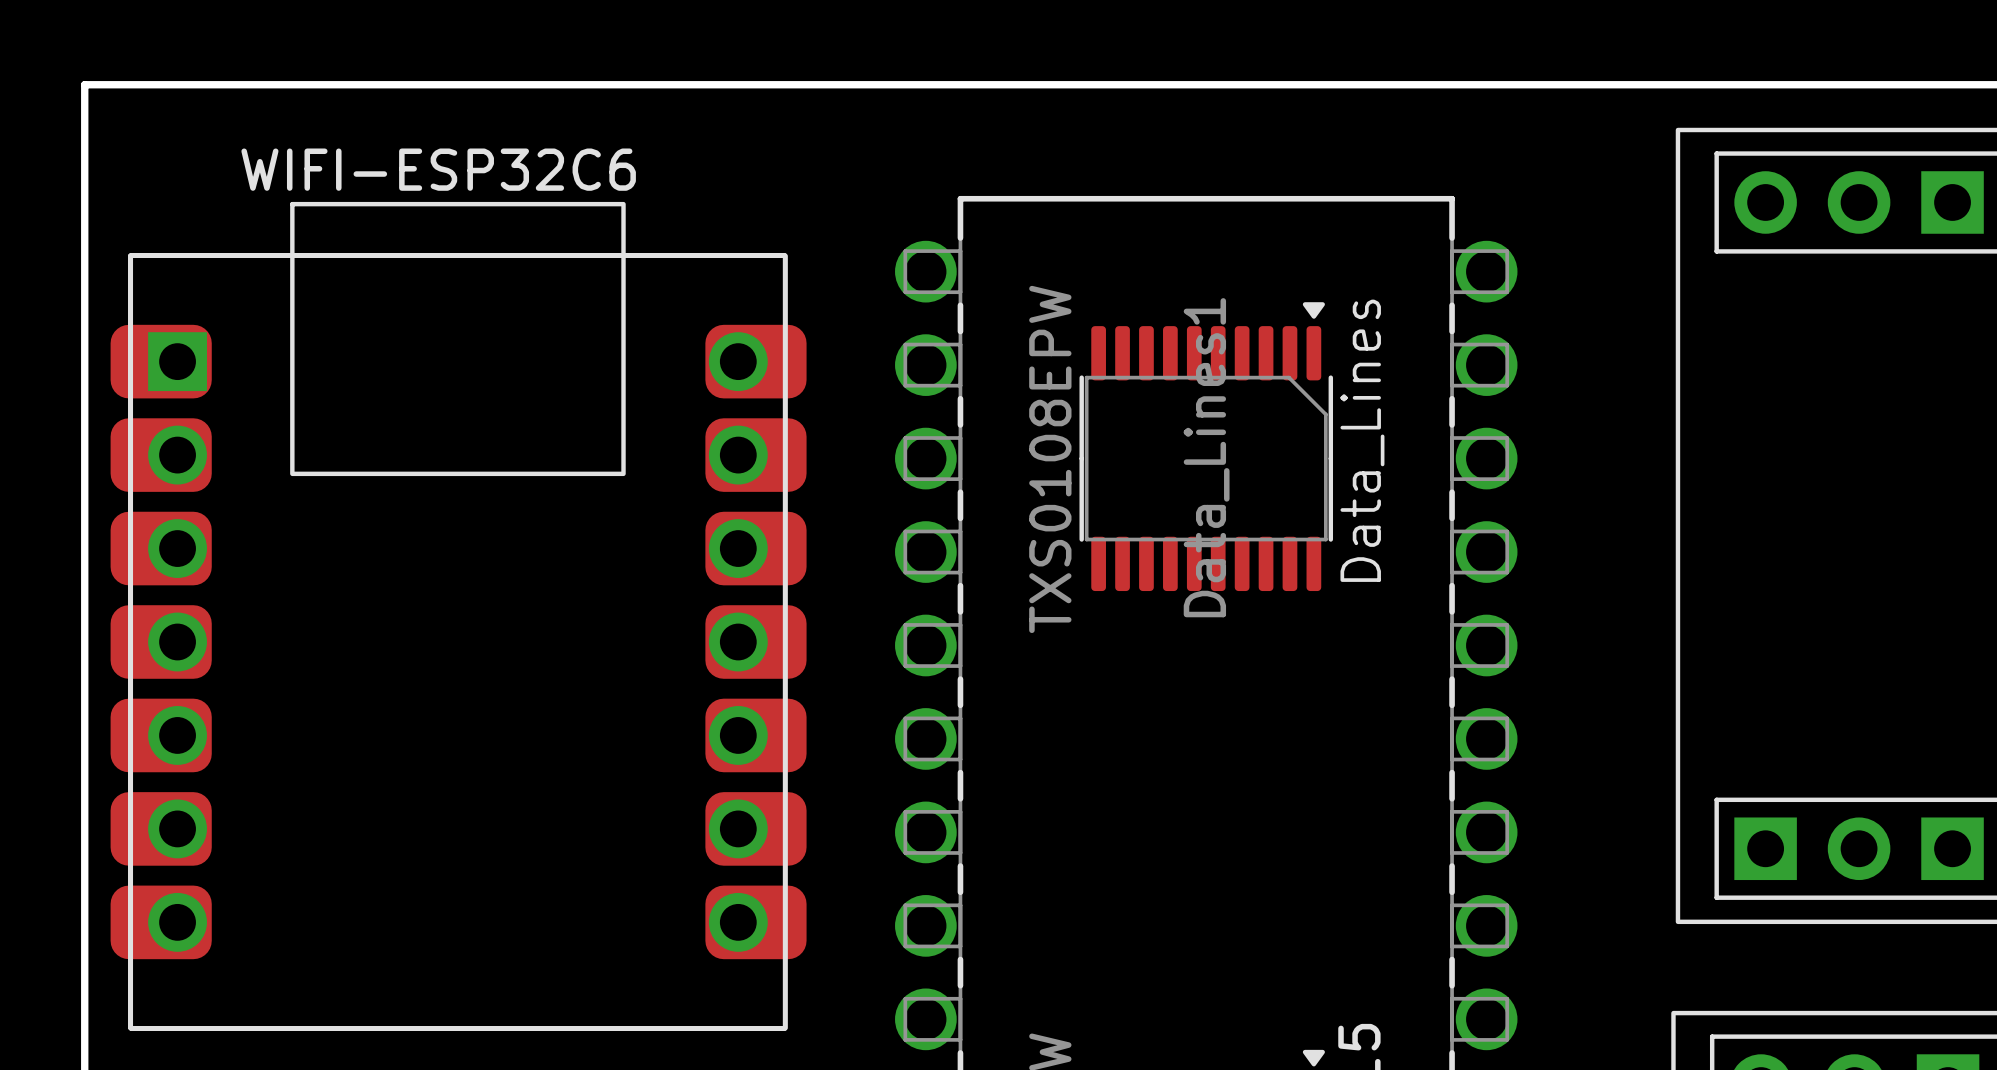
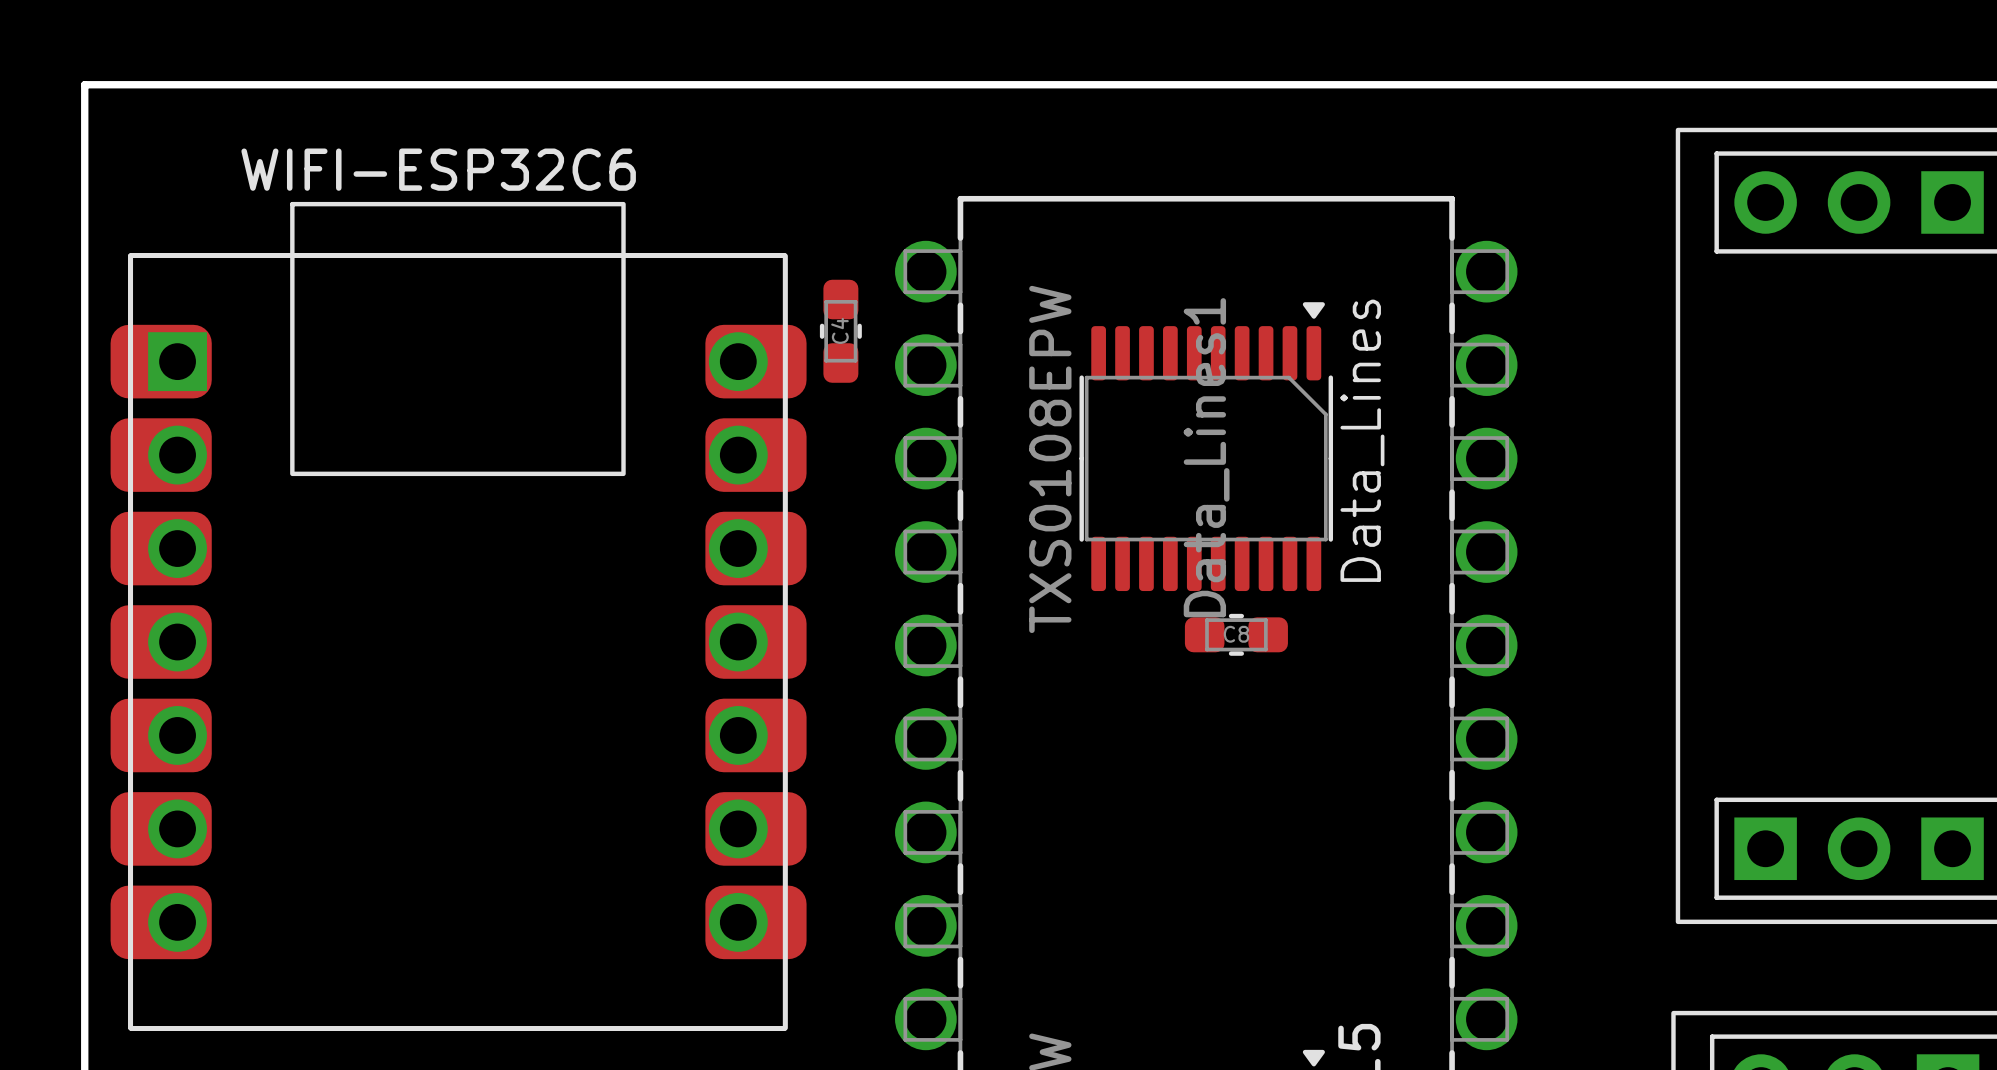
C4: none -> (840, 331)
C8: none -> (1236, 634)

